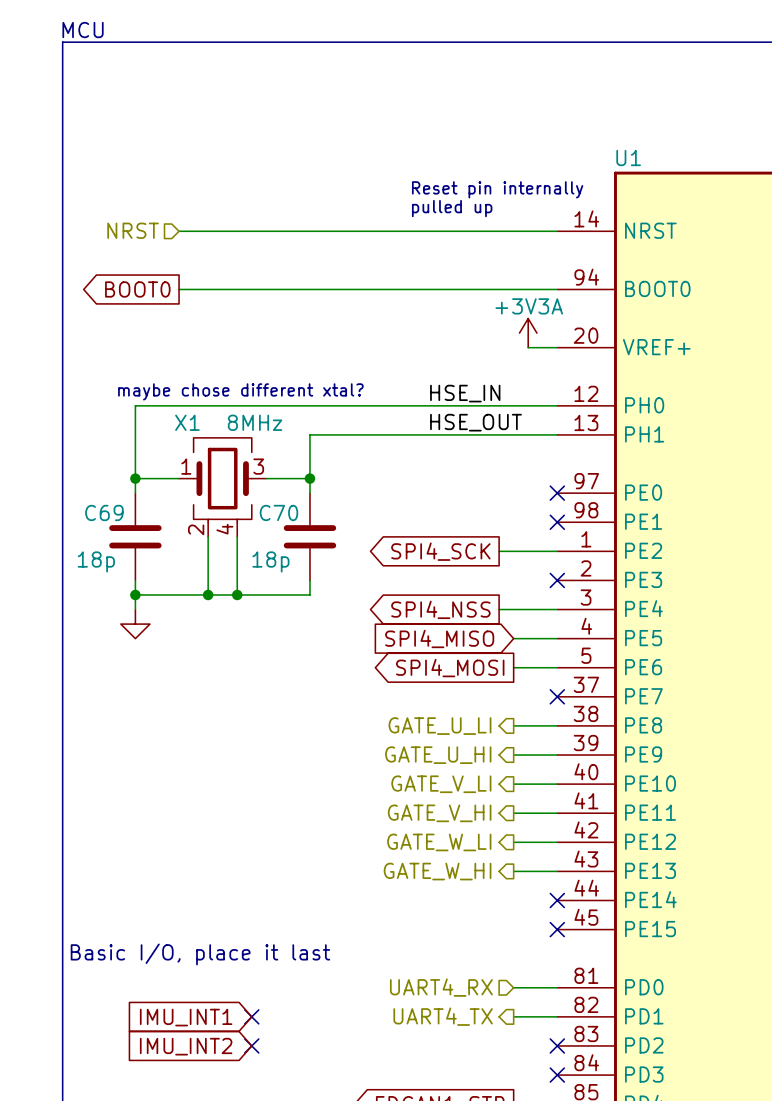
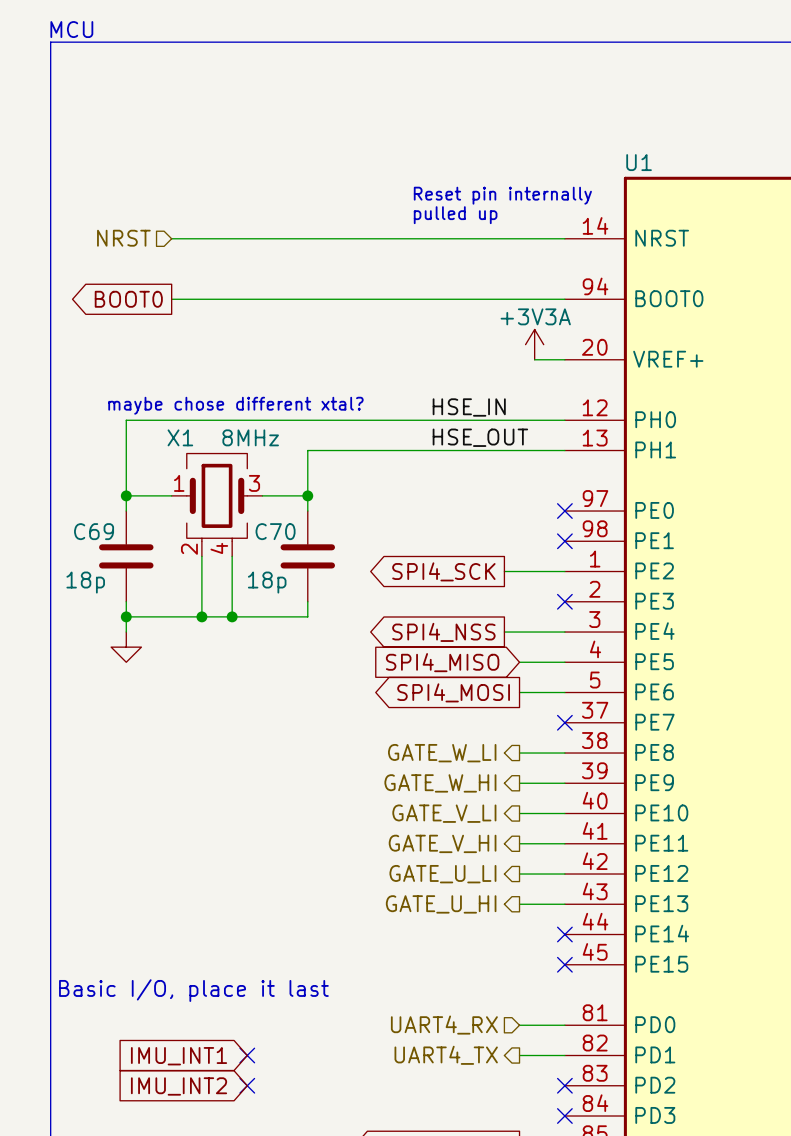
hierarchical label: GATE_U_LI (439, 726) -> GATE_W_LI (442, 753)
hierarchical label: GATE_U_HI (438, 755) -> GATE_W_HI (440, 783)
hierarchical label: GATE_W_LI (439, 842) -> GATE_U_LI (442, 874)
hierarchical label: GATE_W_HI (437, 871) -> GATE_U_HI (441, 904)

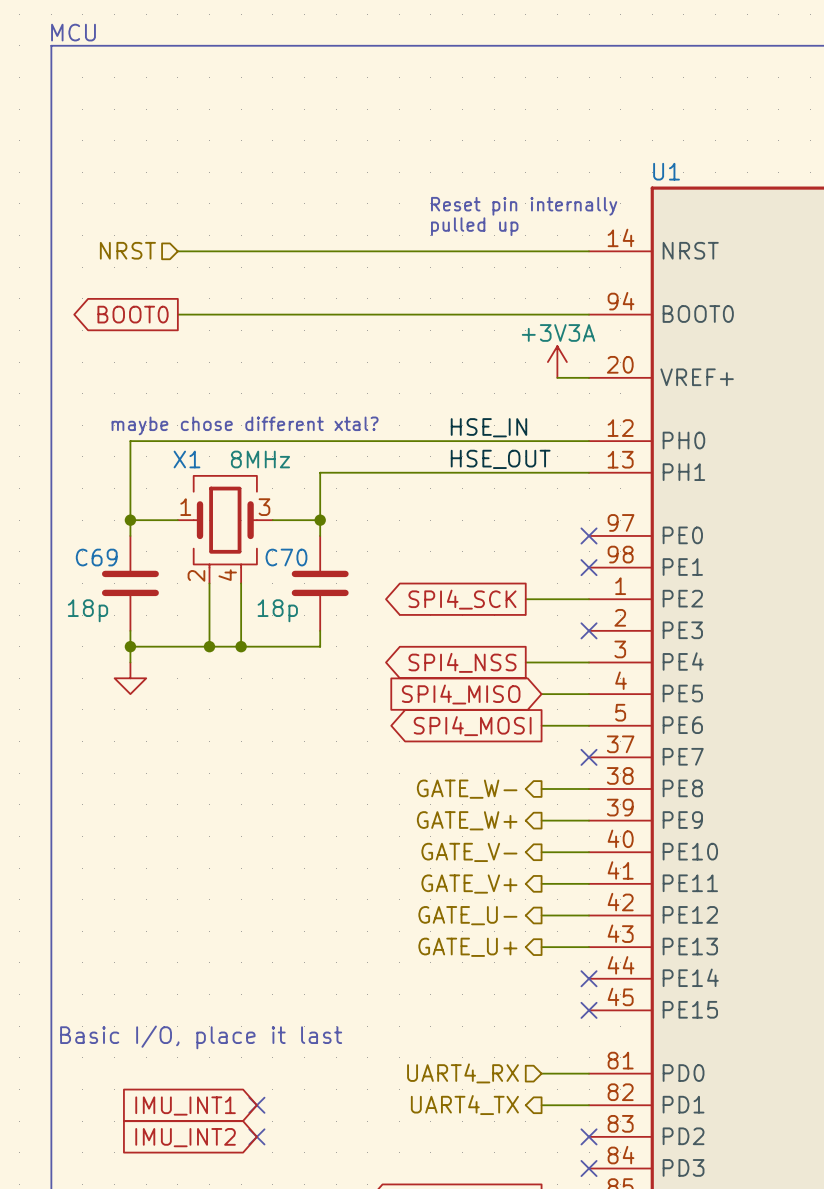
hierarchical label: GATE_W_LI (442, 753) -> GATE_W- (467, 789)
hierarchical label: GATE_W_HI (440, 783) -> GATE_W+ (467, 820)
hierarchical label: GATE_V_LI (444, 813) -> GATE_V- (469, 852)
hierarchical label: GATE_V_HI (442, 843) -> GATE_V+ (469, 884)
hierarchical label: GATE_U_LI (442, 874) -> GATE_U- (467, 915)
hierarchical label: GATE_U_HI (441, 904) -> GATE_U+ (467, 947)

